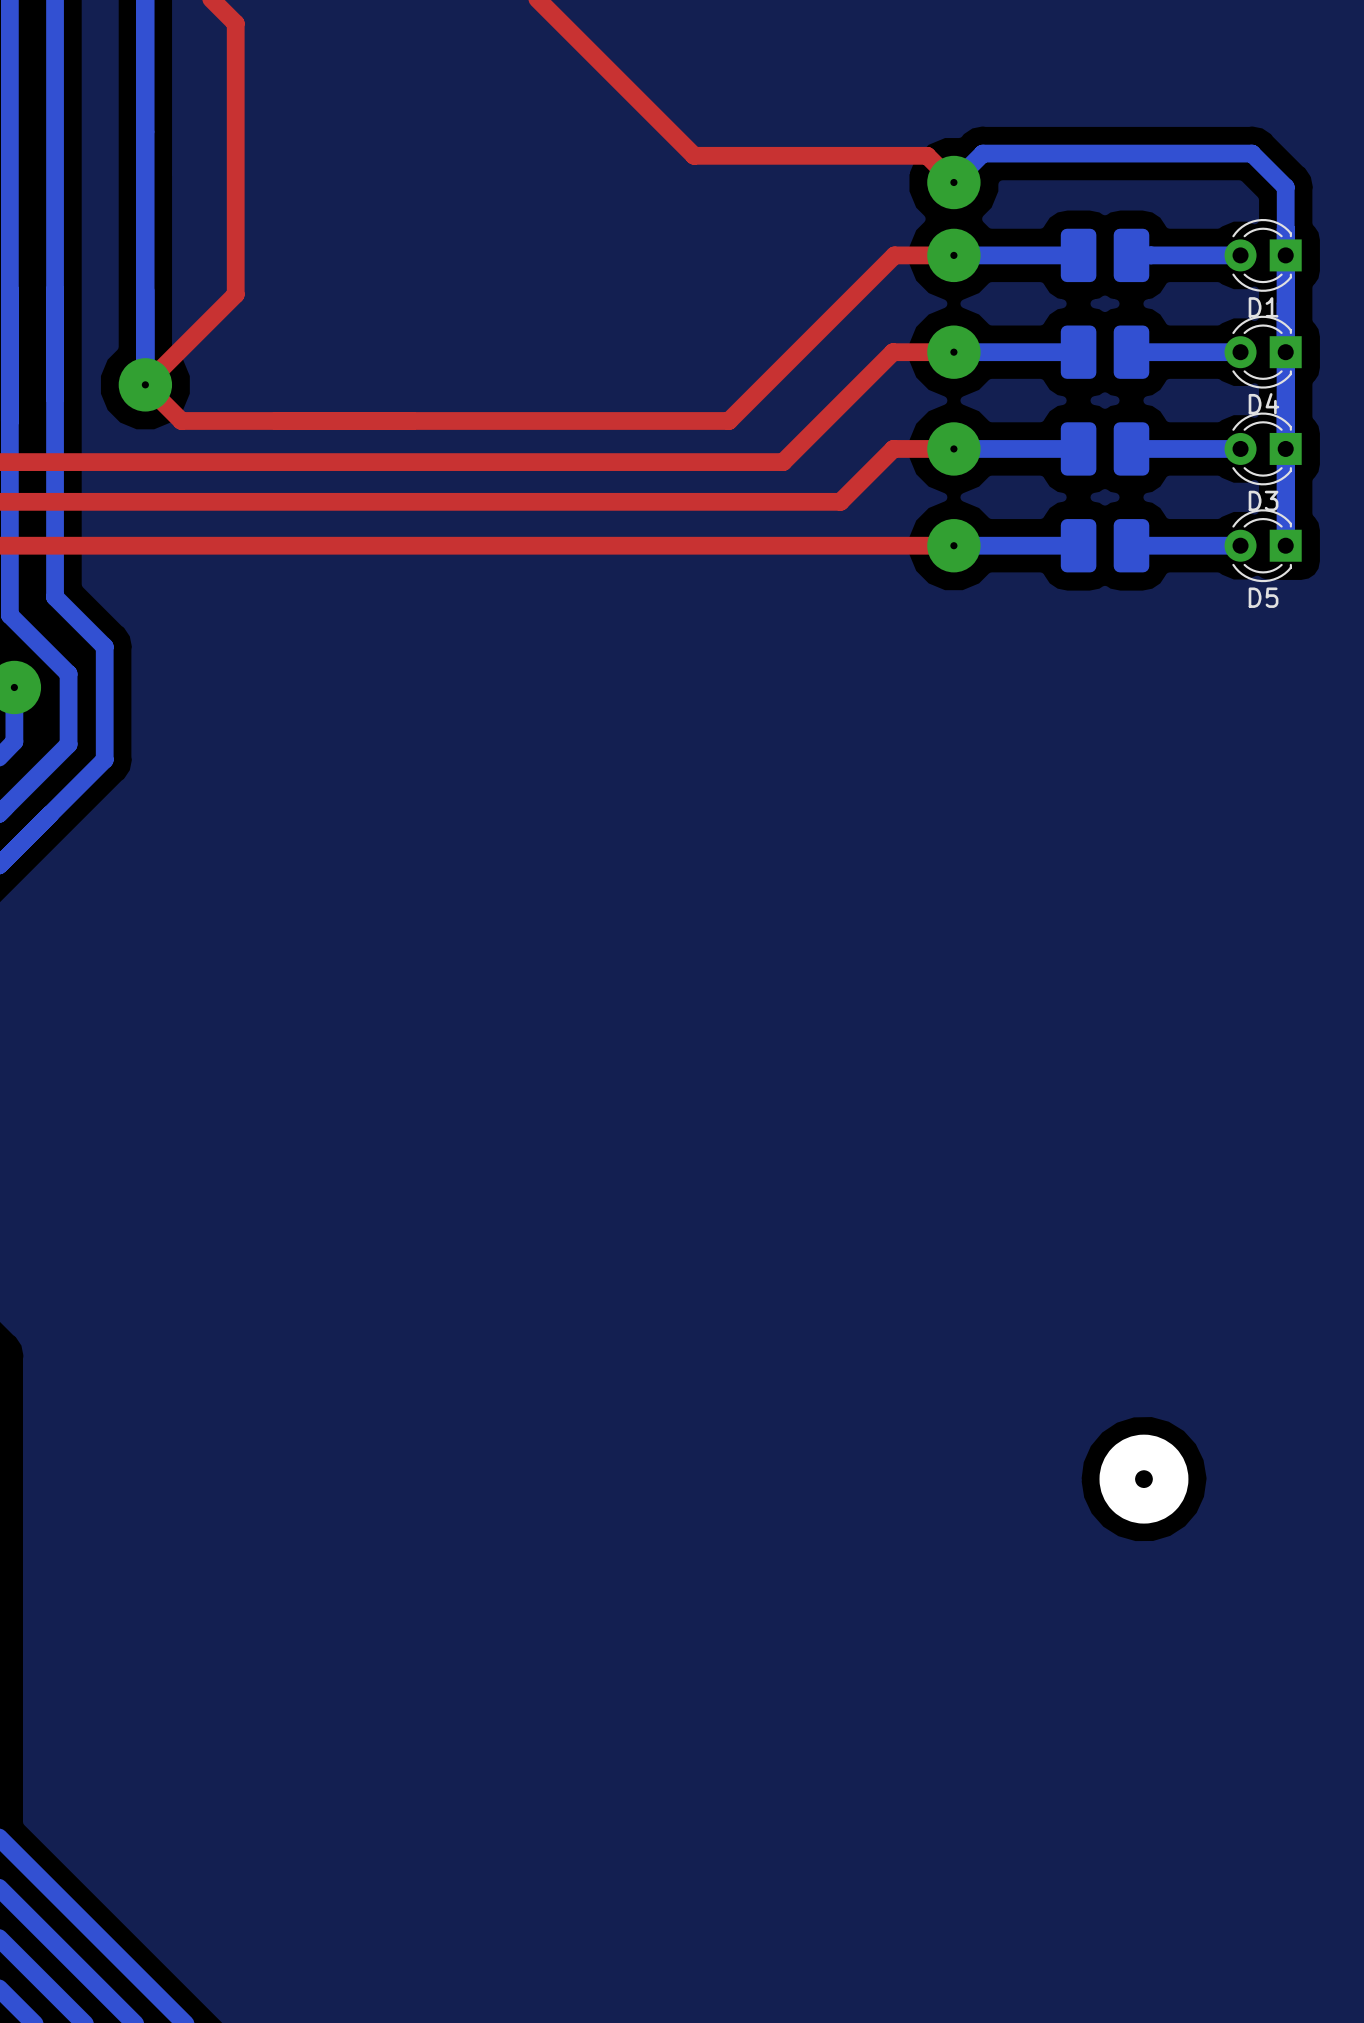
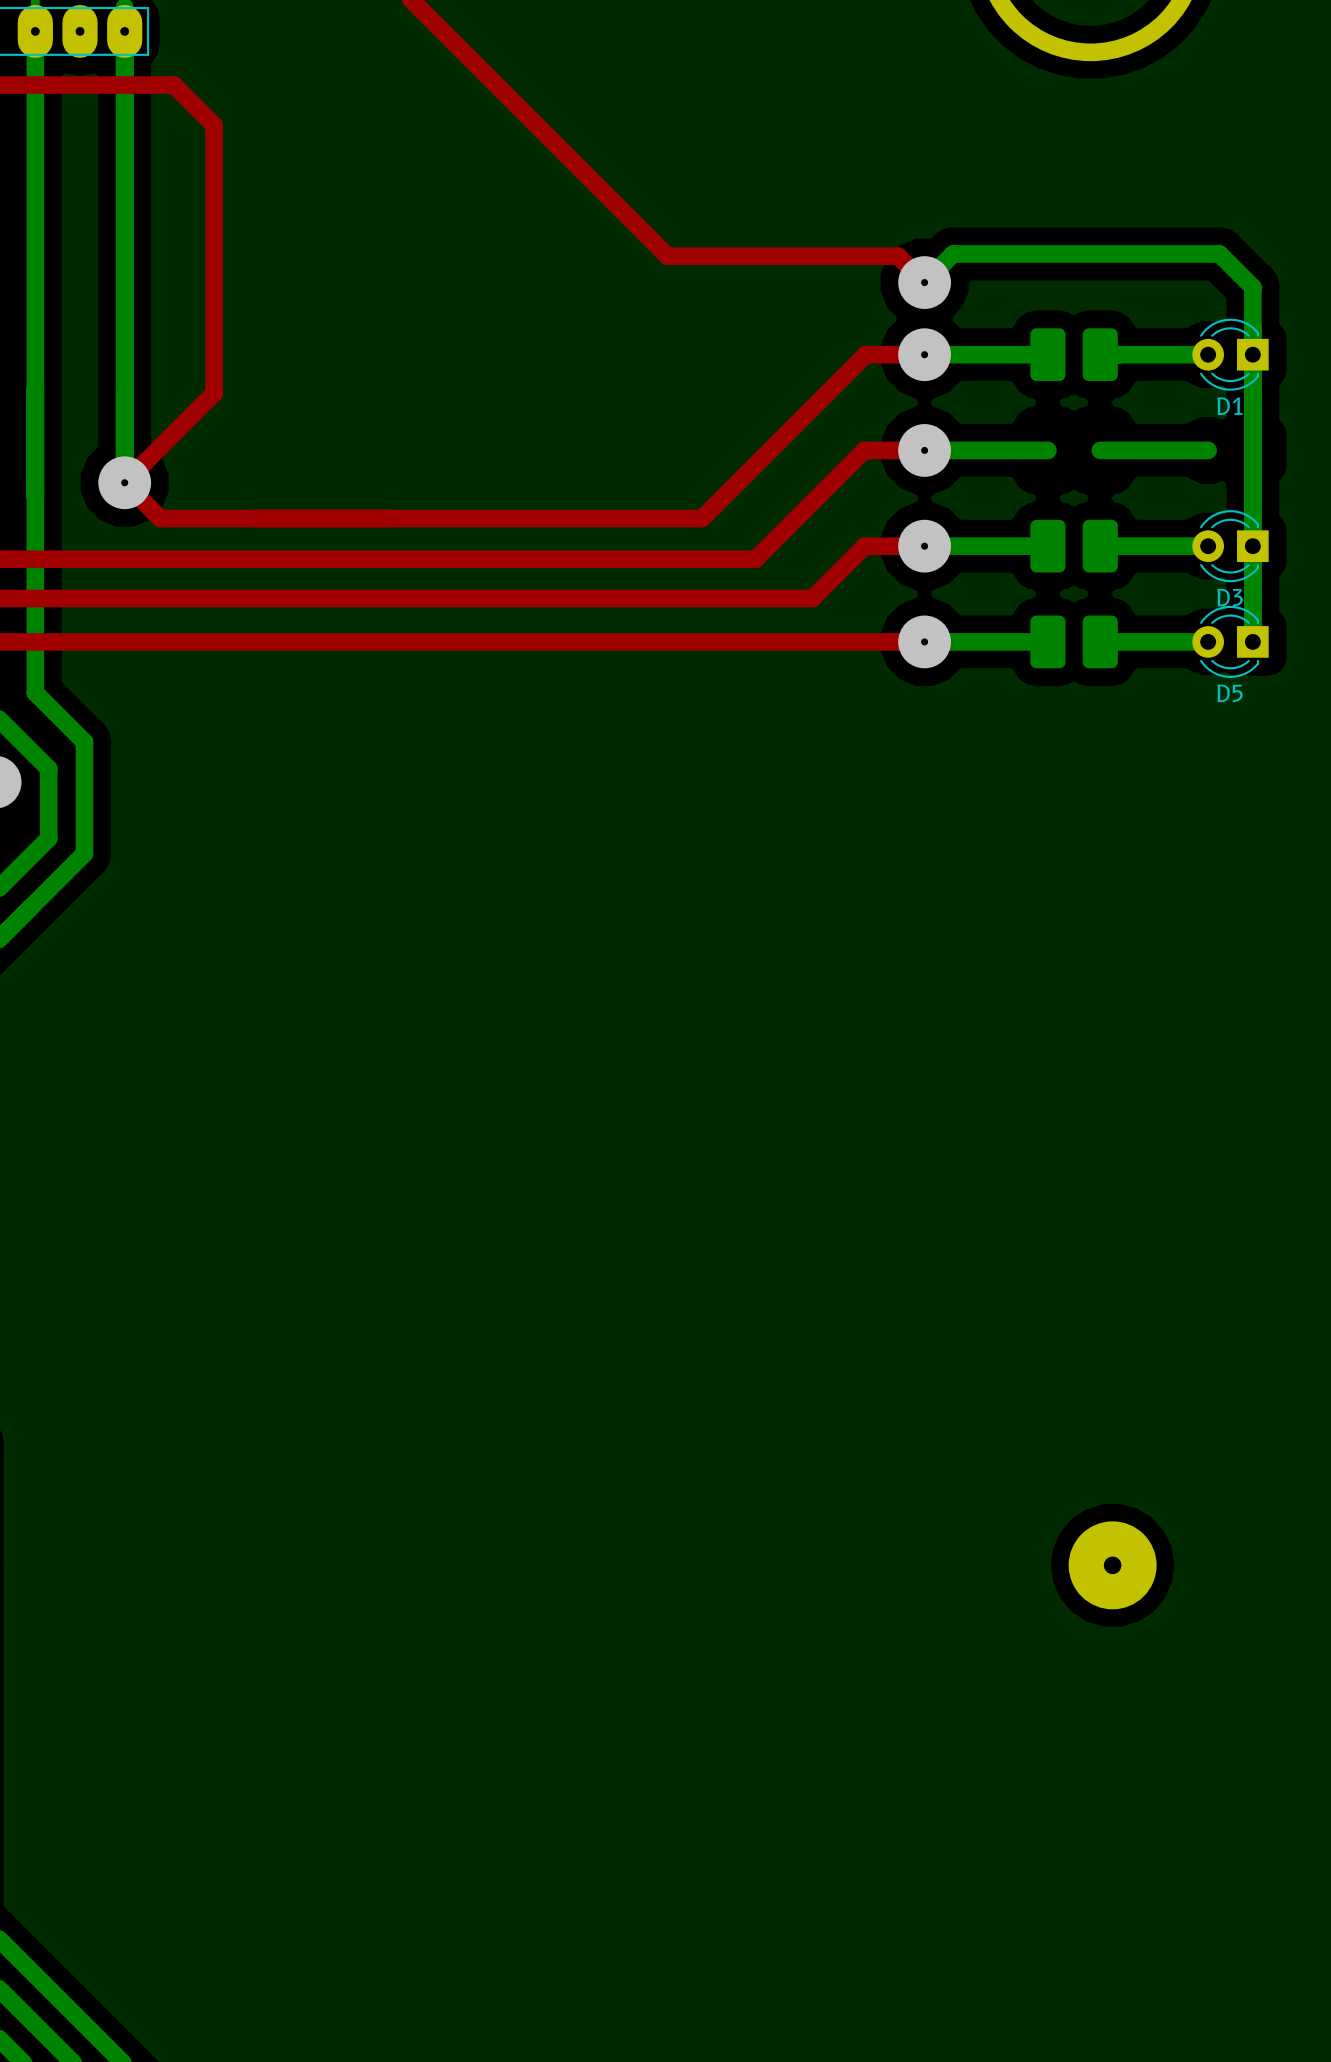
part: (1105, 352) -> none
D4: (1263, 352) -> none

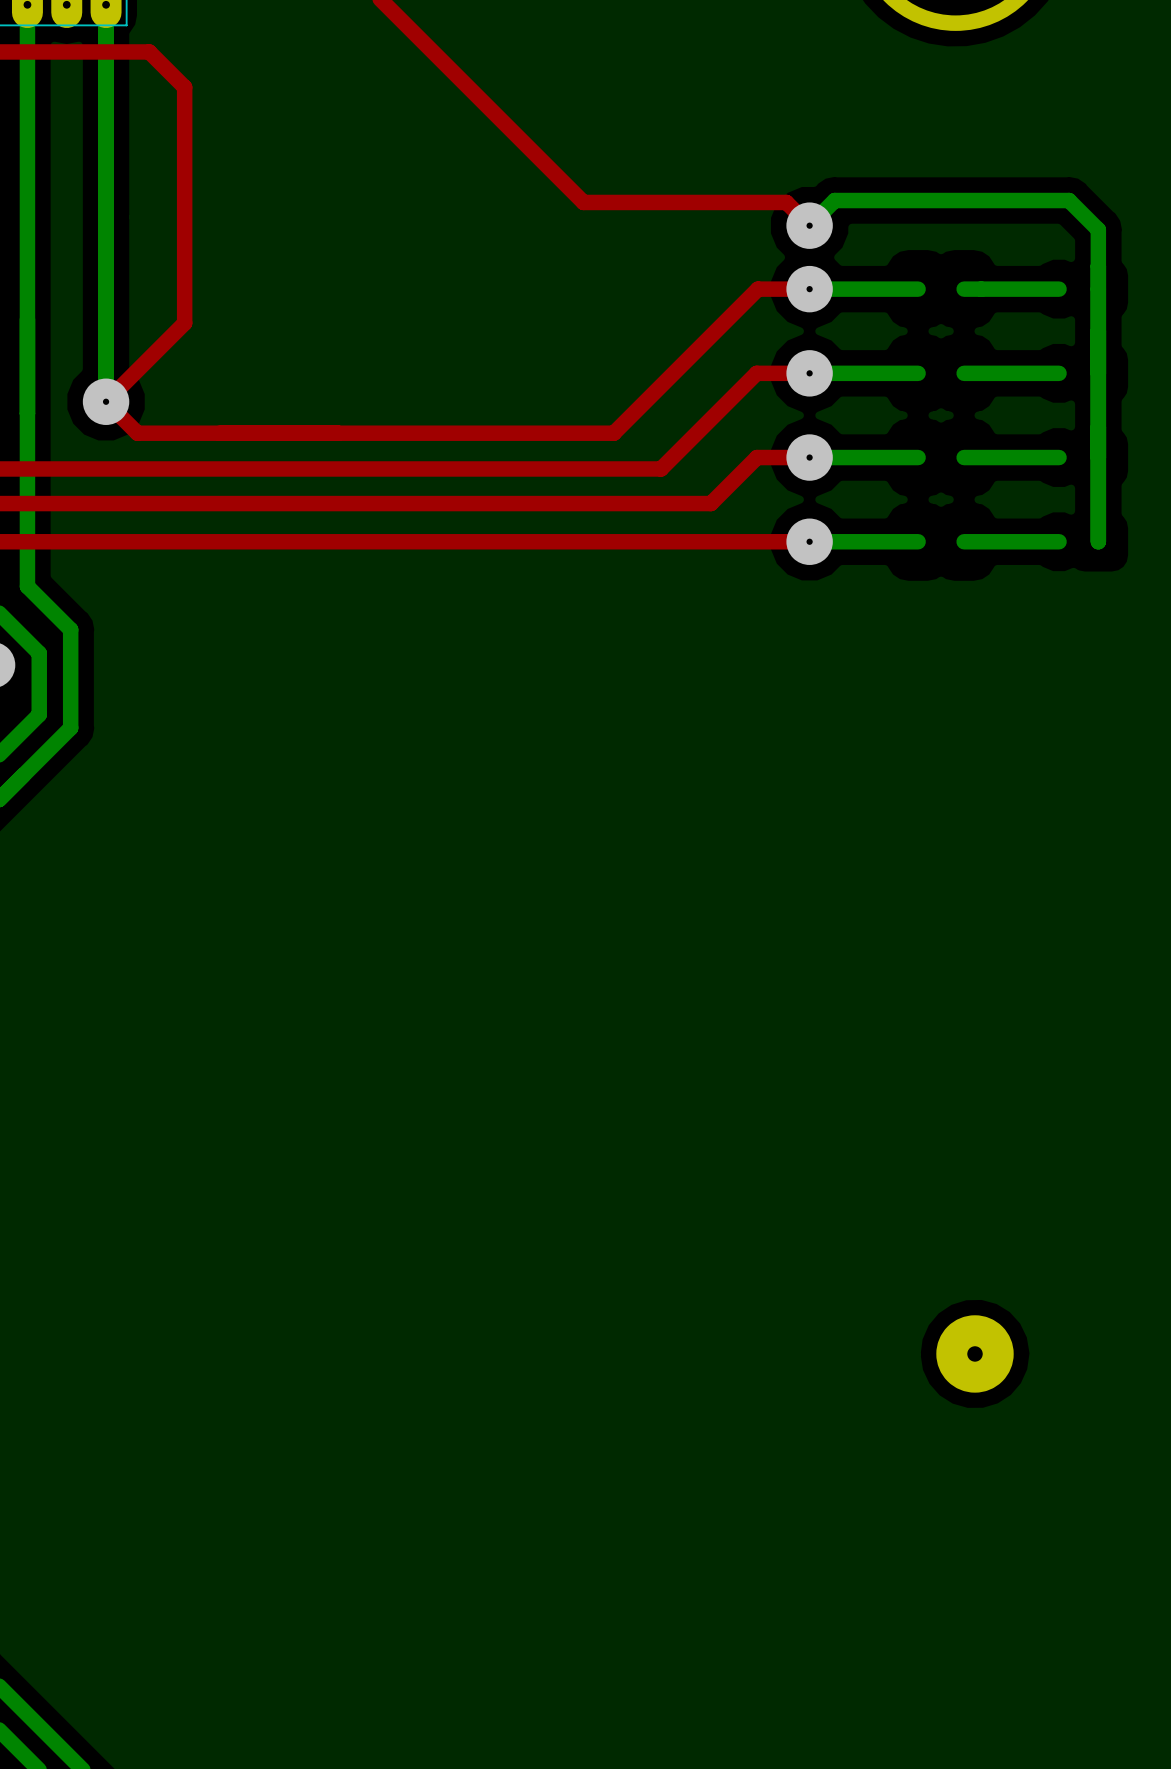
part: (1074, 354) -> none
D1: (1230, 354) -> none
part: (1074, 546) -> none
D3: (1230, 546) -> none
part: (1074, 641) -> none
D5: (1230, 641) -> none

